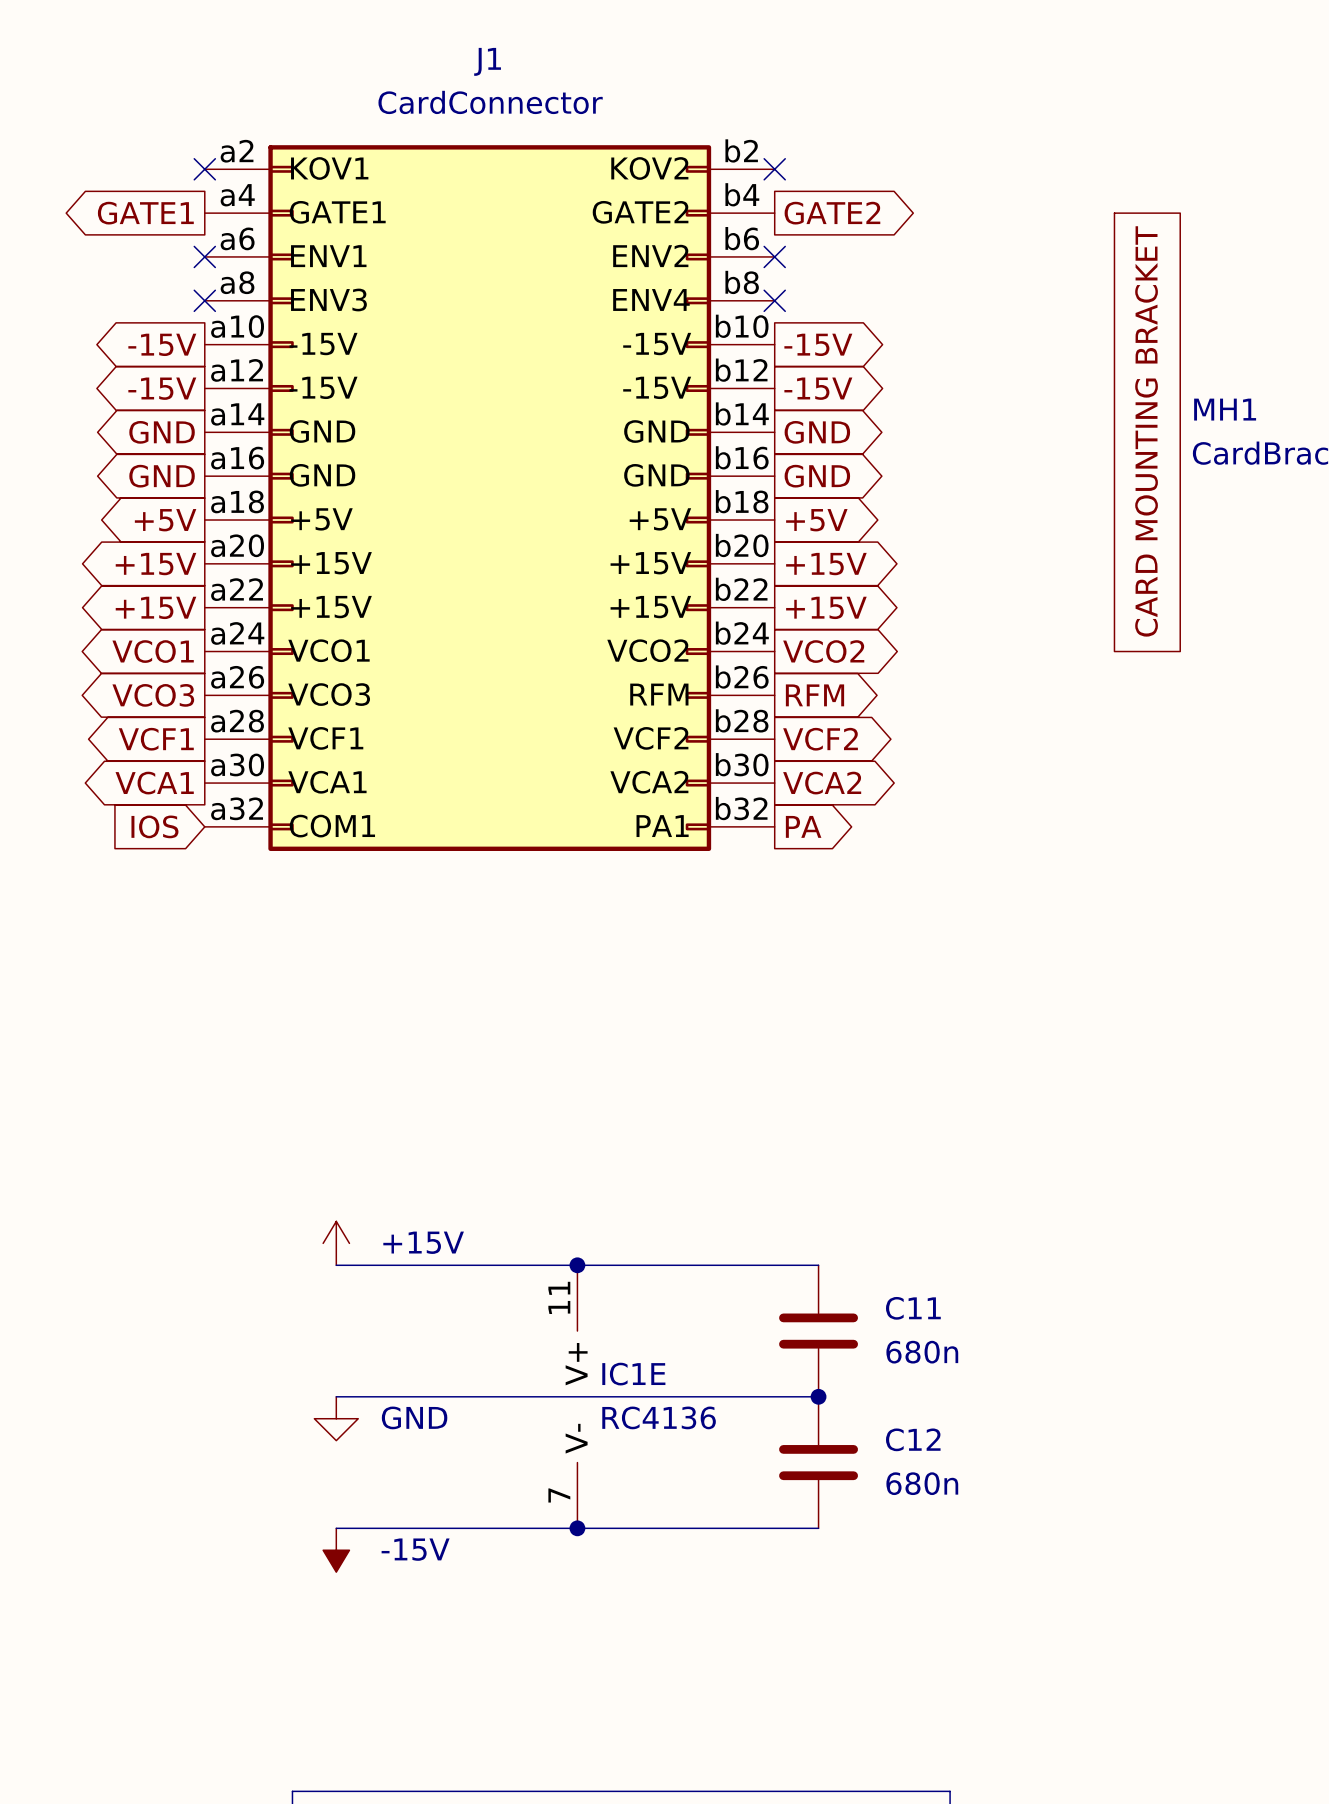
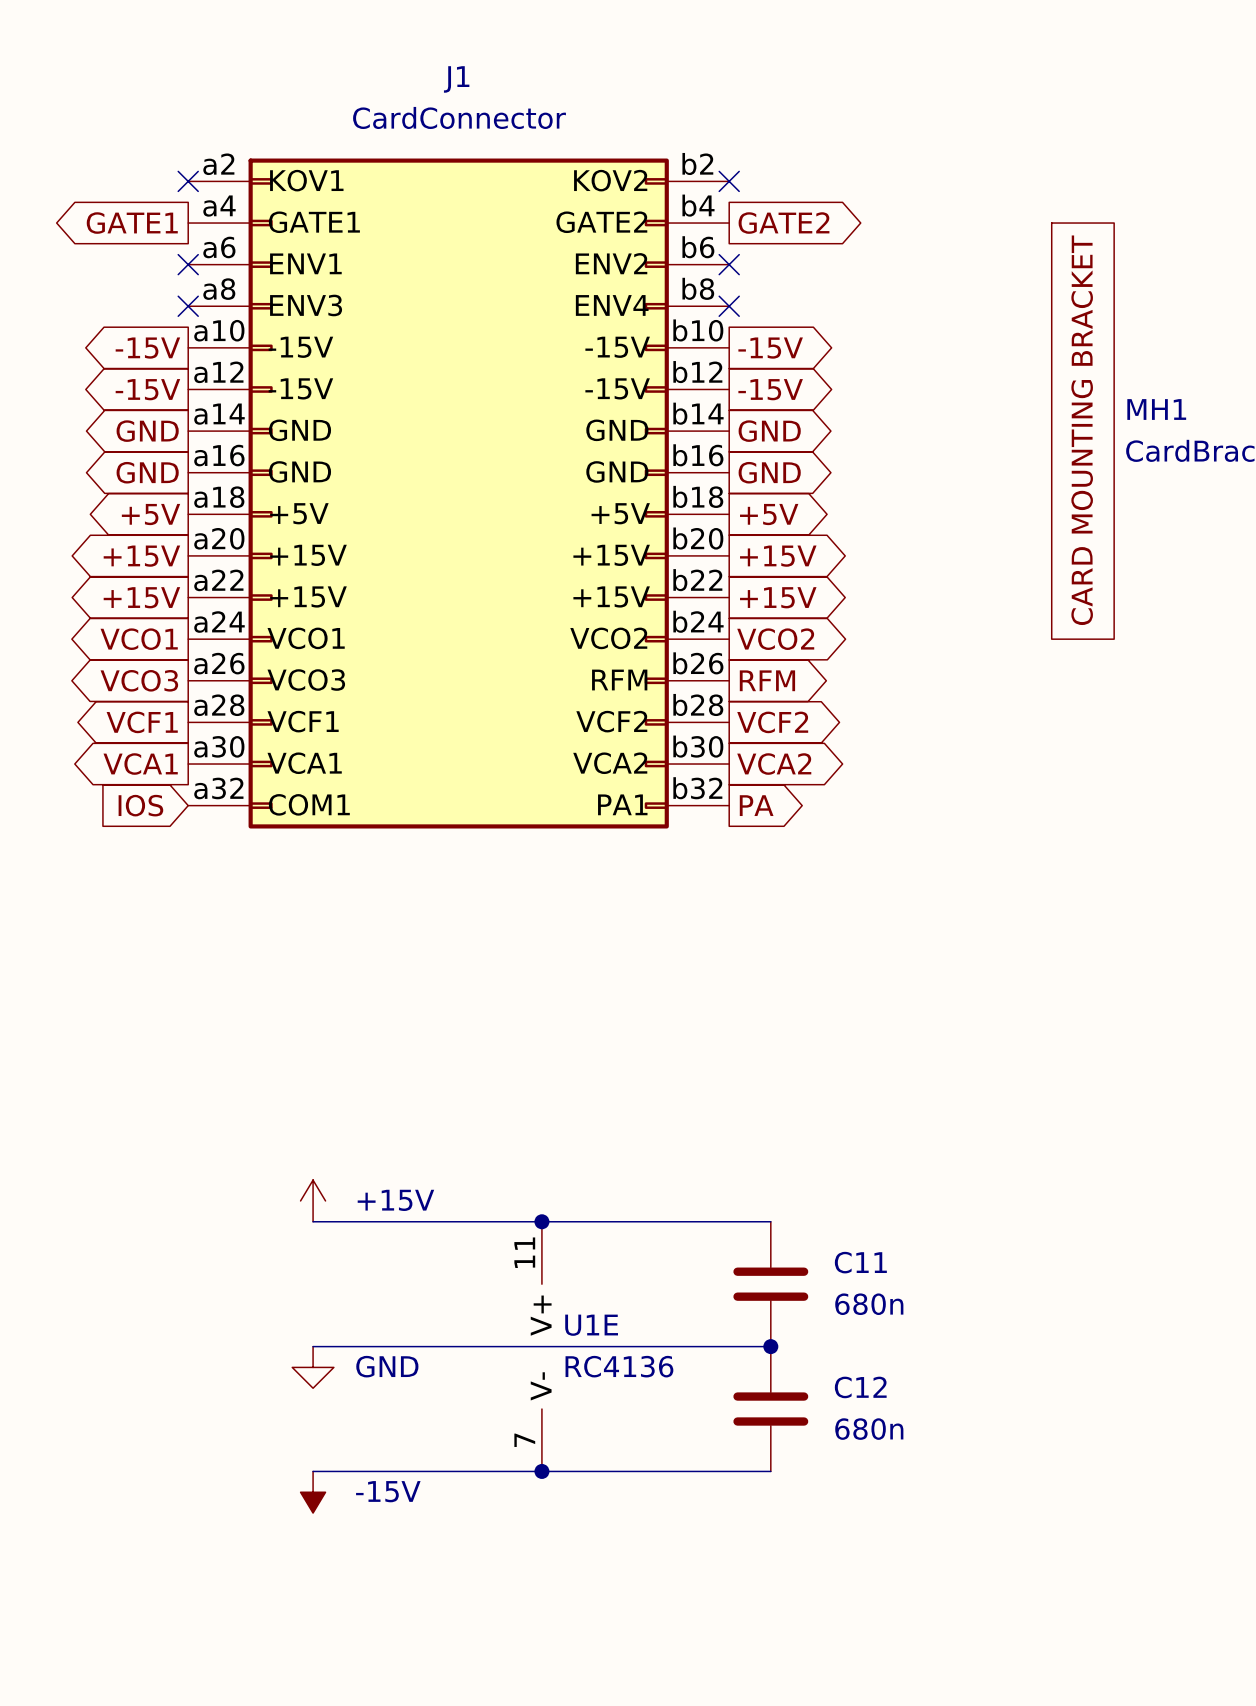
IC1E name: IC1E (633, 1374) -> U1E (591, 1325)

